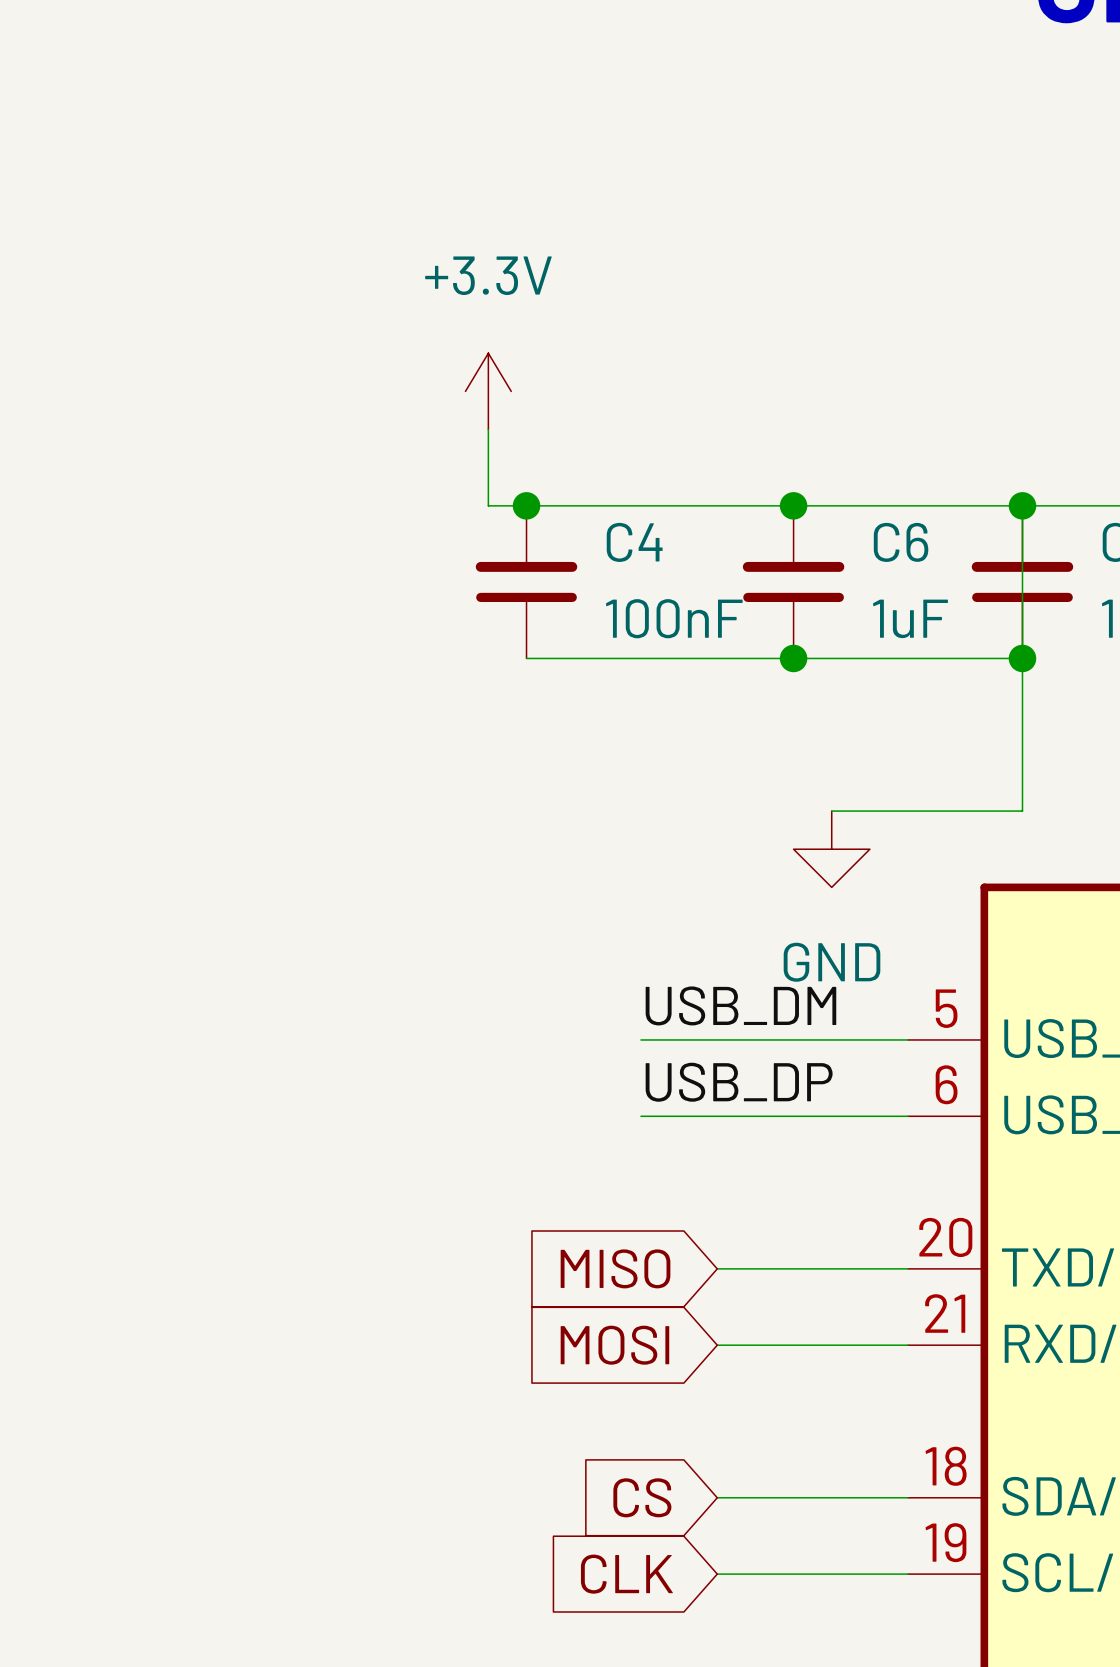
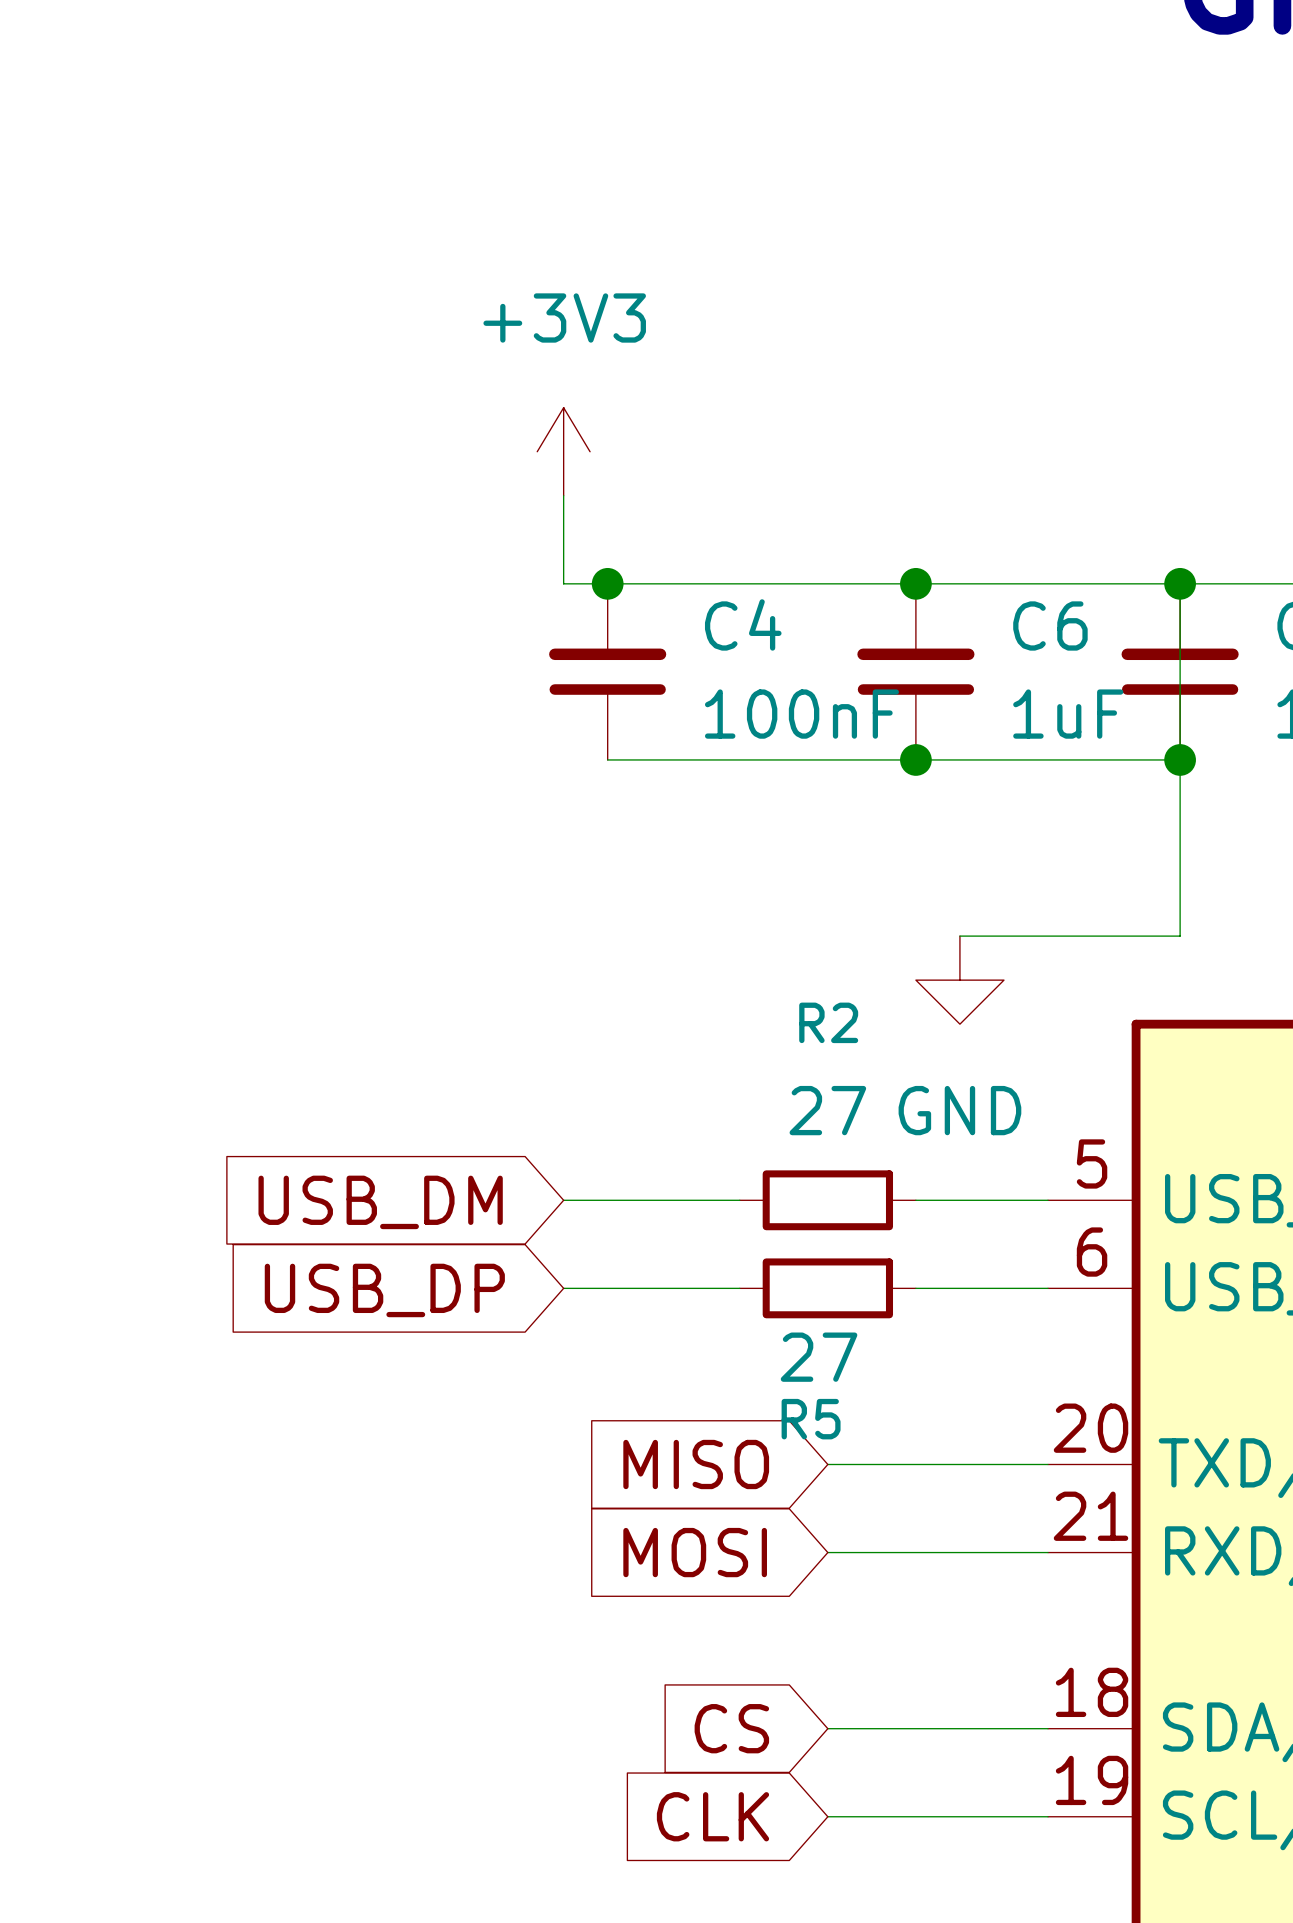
power symbol: +3.3V (488, 391) -> +3V3 (563, 451)
label: USB_DM (740, 1005) -> none
global label: none -> USB_DM (380, 1202)
wire: (640, 1039) (793, 1039) -> (739, 1200) (563, 1200)
R2: none -> 27 (827, 1200)
label: USB_DP (739, 1082) -> none
global label: none -> USB_DP (384, 1290)
wire: (640, 1116) (793, 1116) -> (739, 1288) (563, 1288)
R5: none -> 27 (827, 1288)

